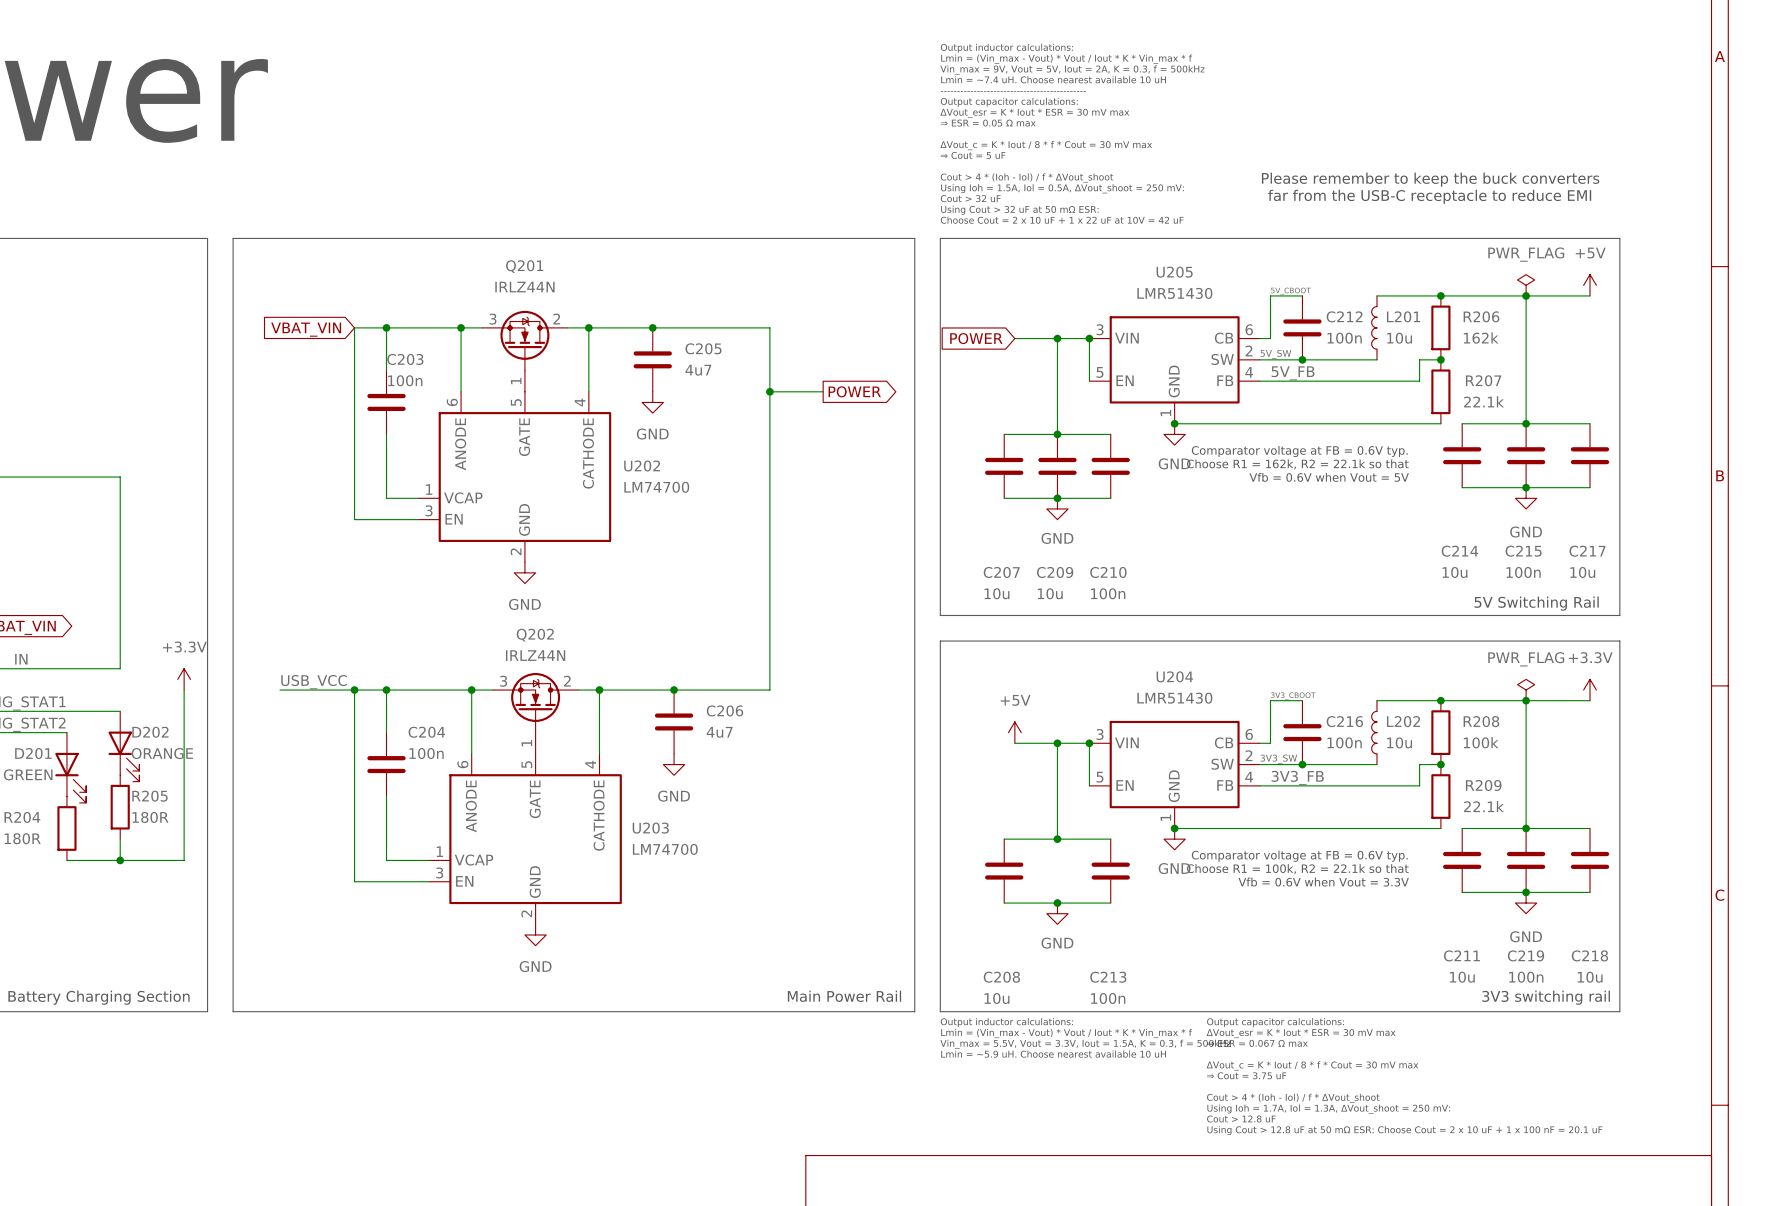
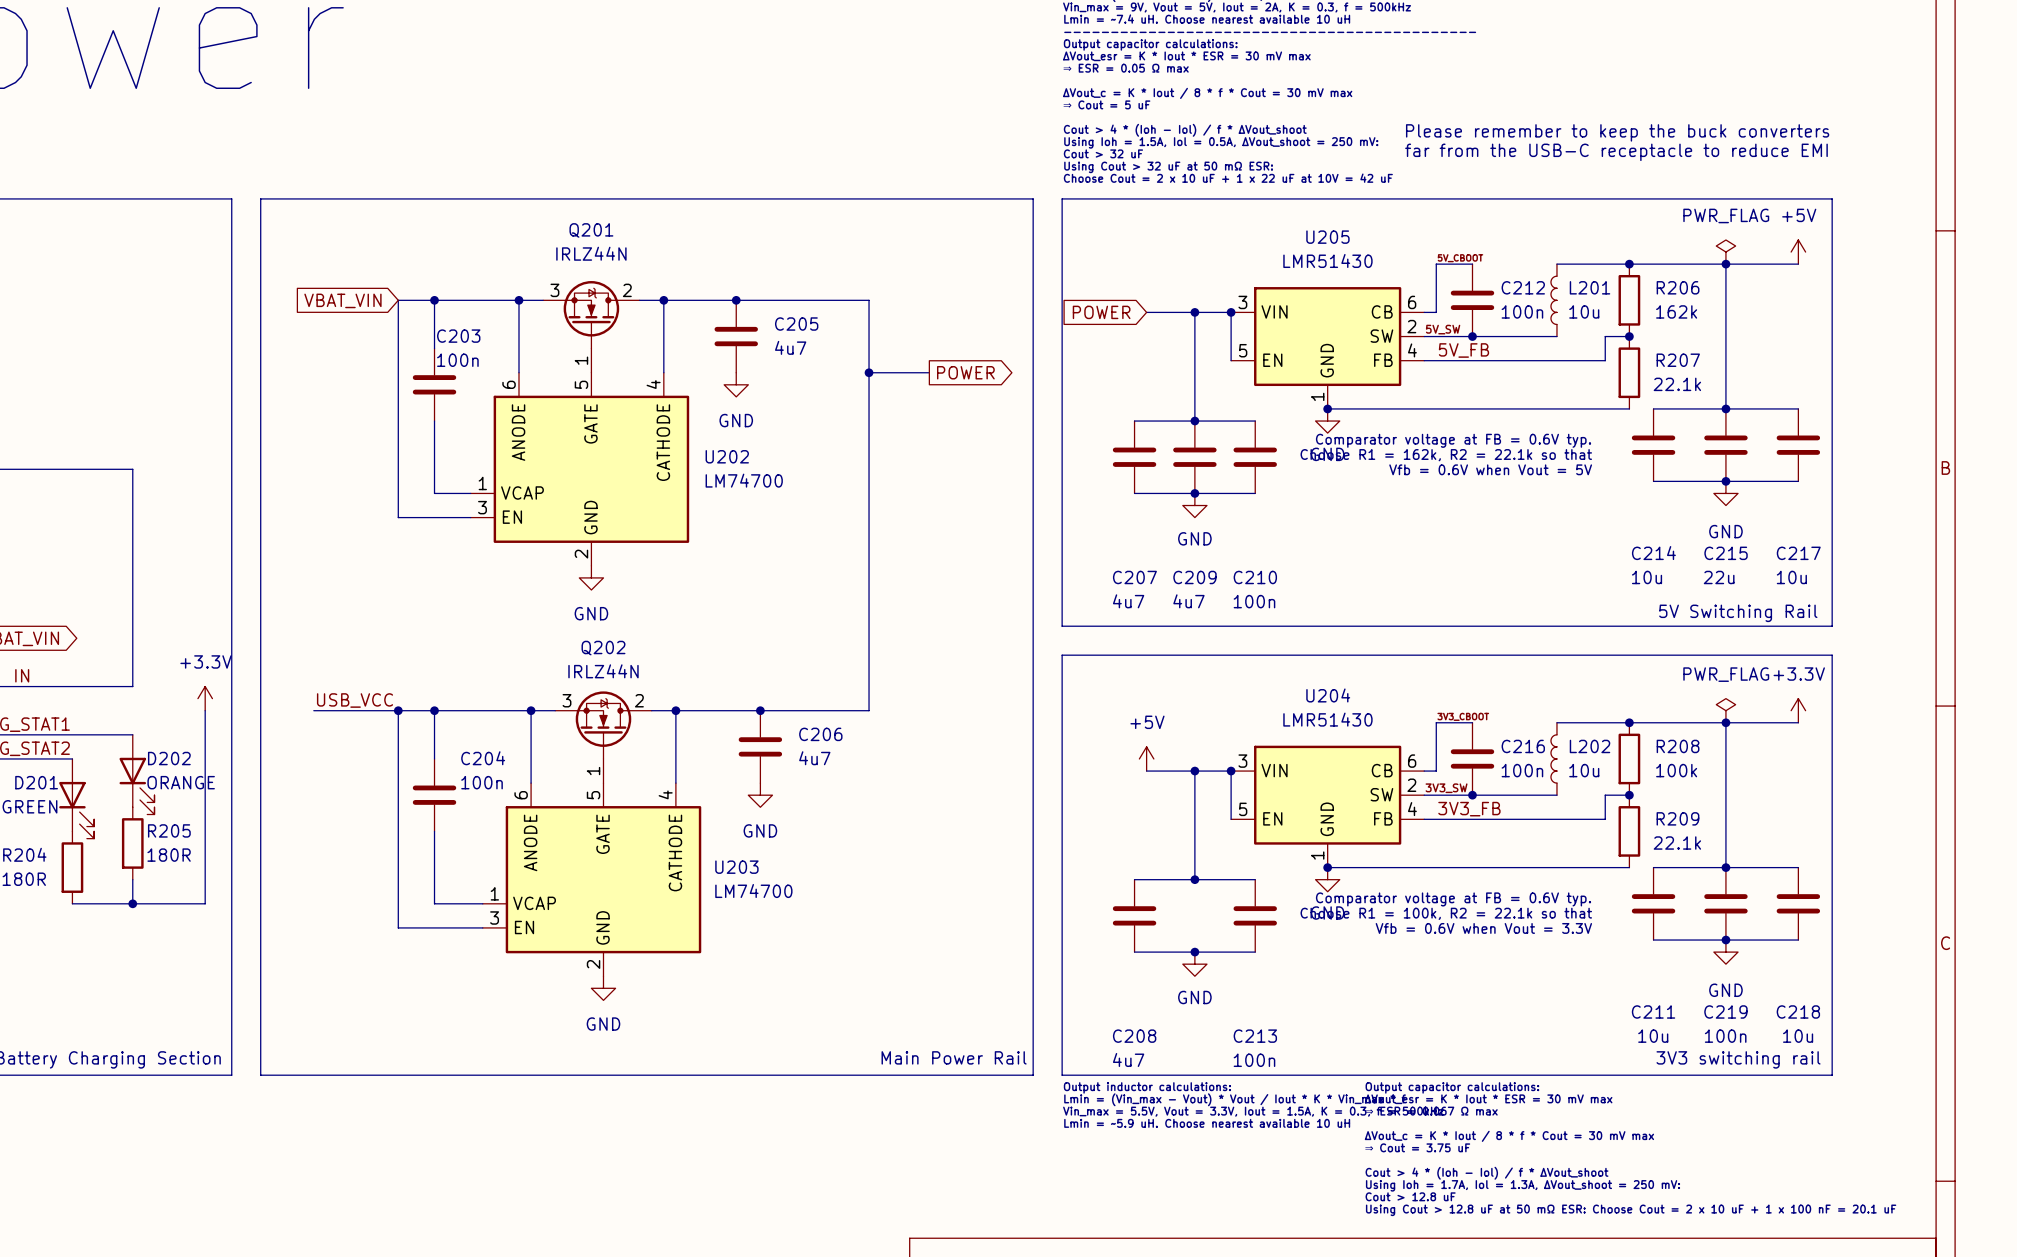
C215 value: 100n (1523, 572) -> 22u (1719, 577)
C207 value: 10u (996, 593) -> 4u7 (1128, 601)
C209 value: 10u (1050, 593) -> 4u7 (1188, 601)
C208 value: 10u (996, 998) -> 4u7 (1128, 1059)

